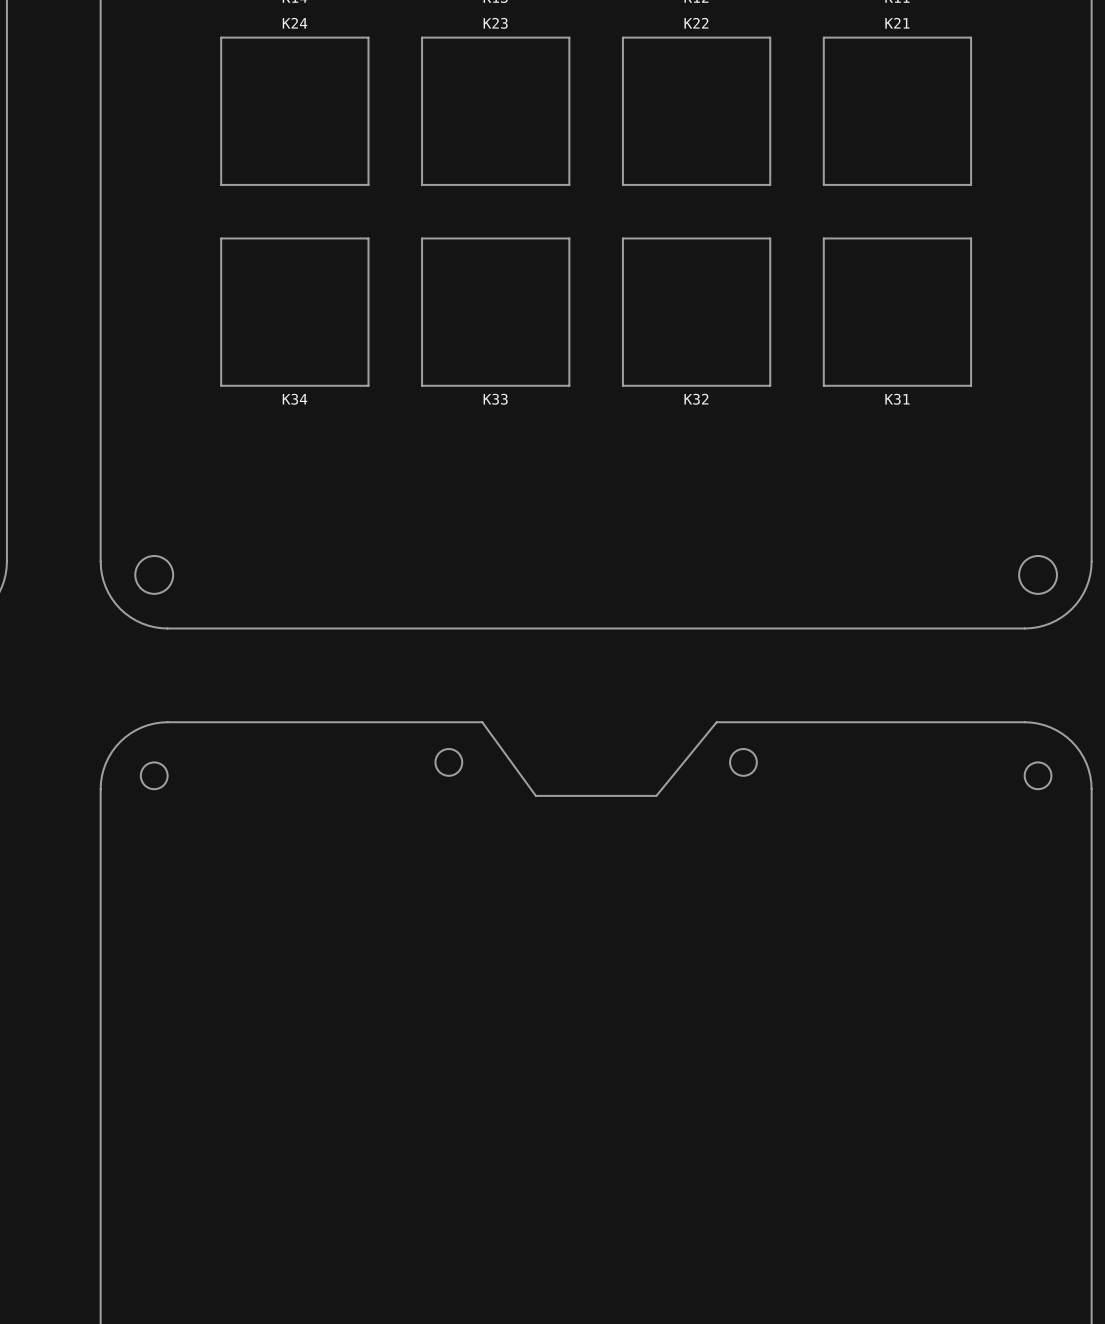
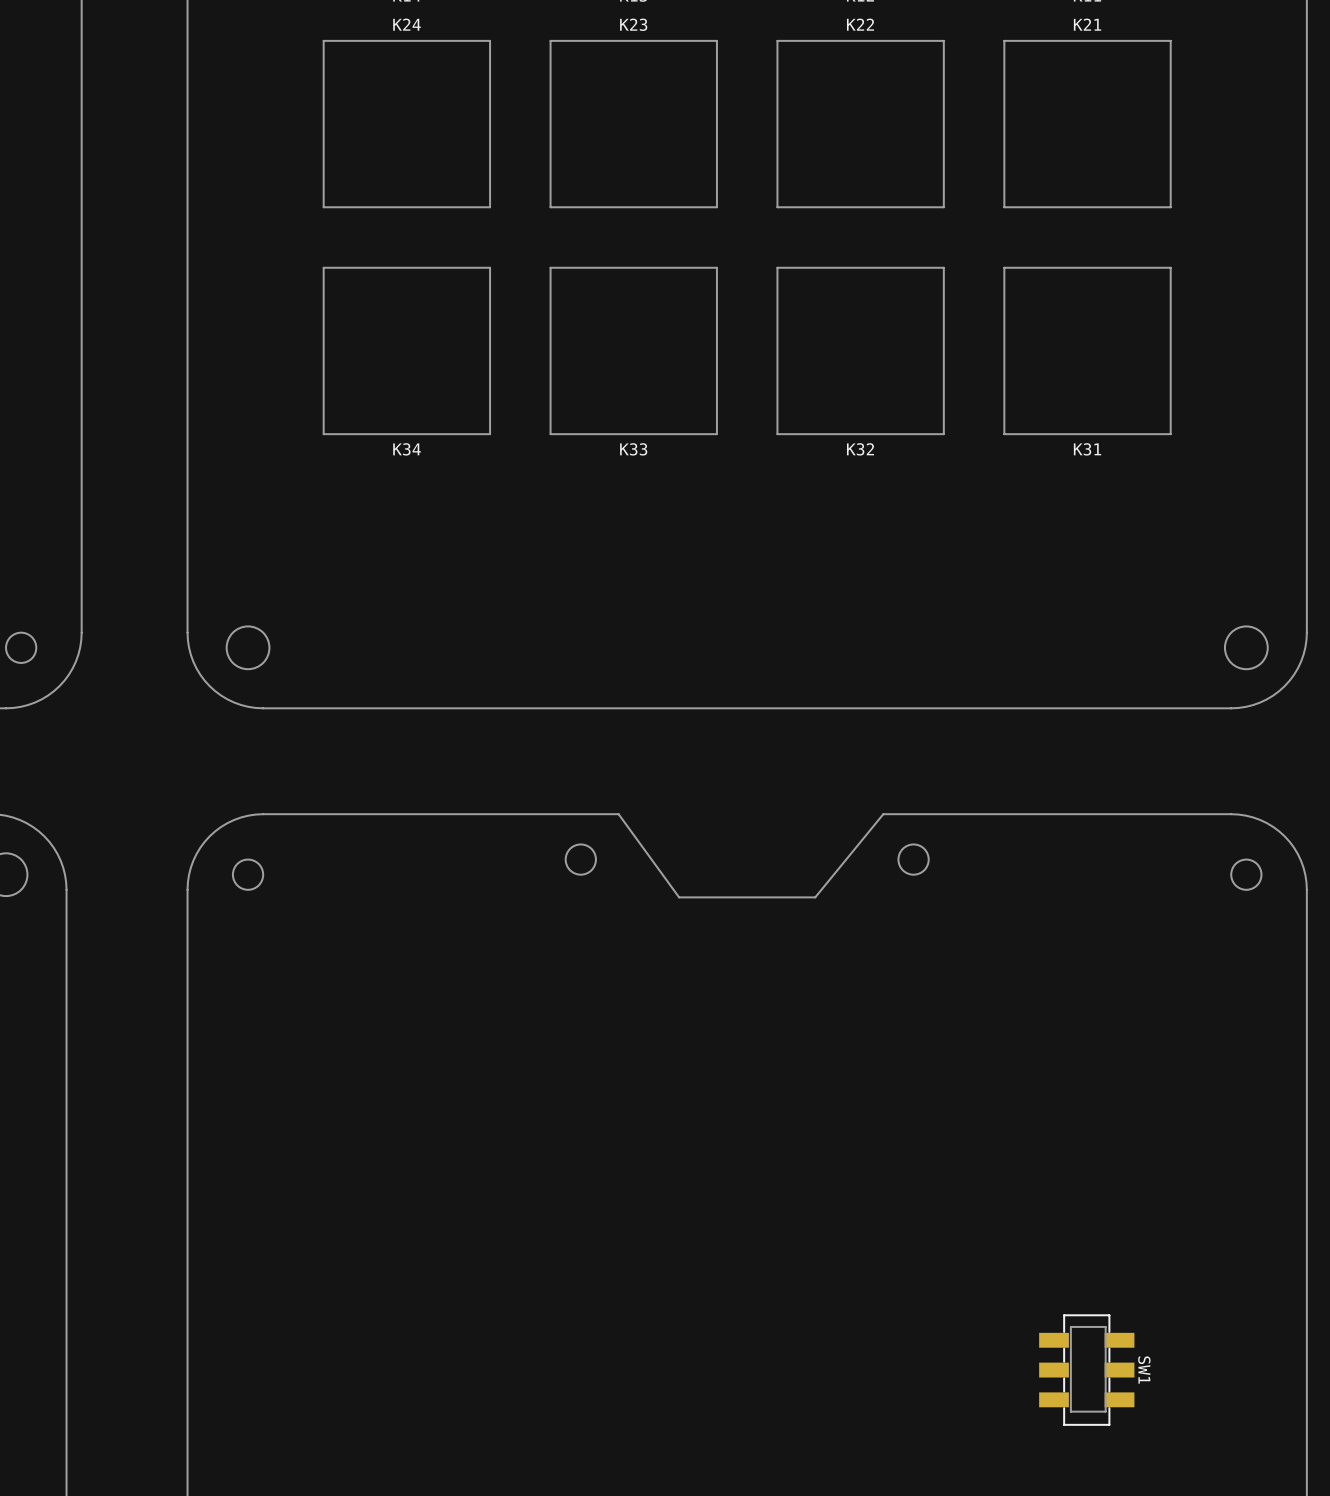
board edge: none -> (1105, 1326) (1105, 1411) (1070, 1411) (1070, 1326) (1105, 1326)
SW1: none -> (1086, 1370)

